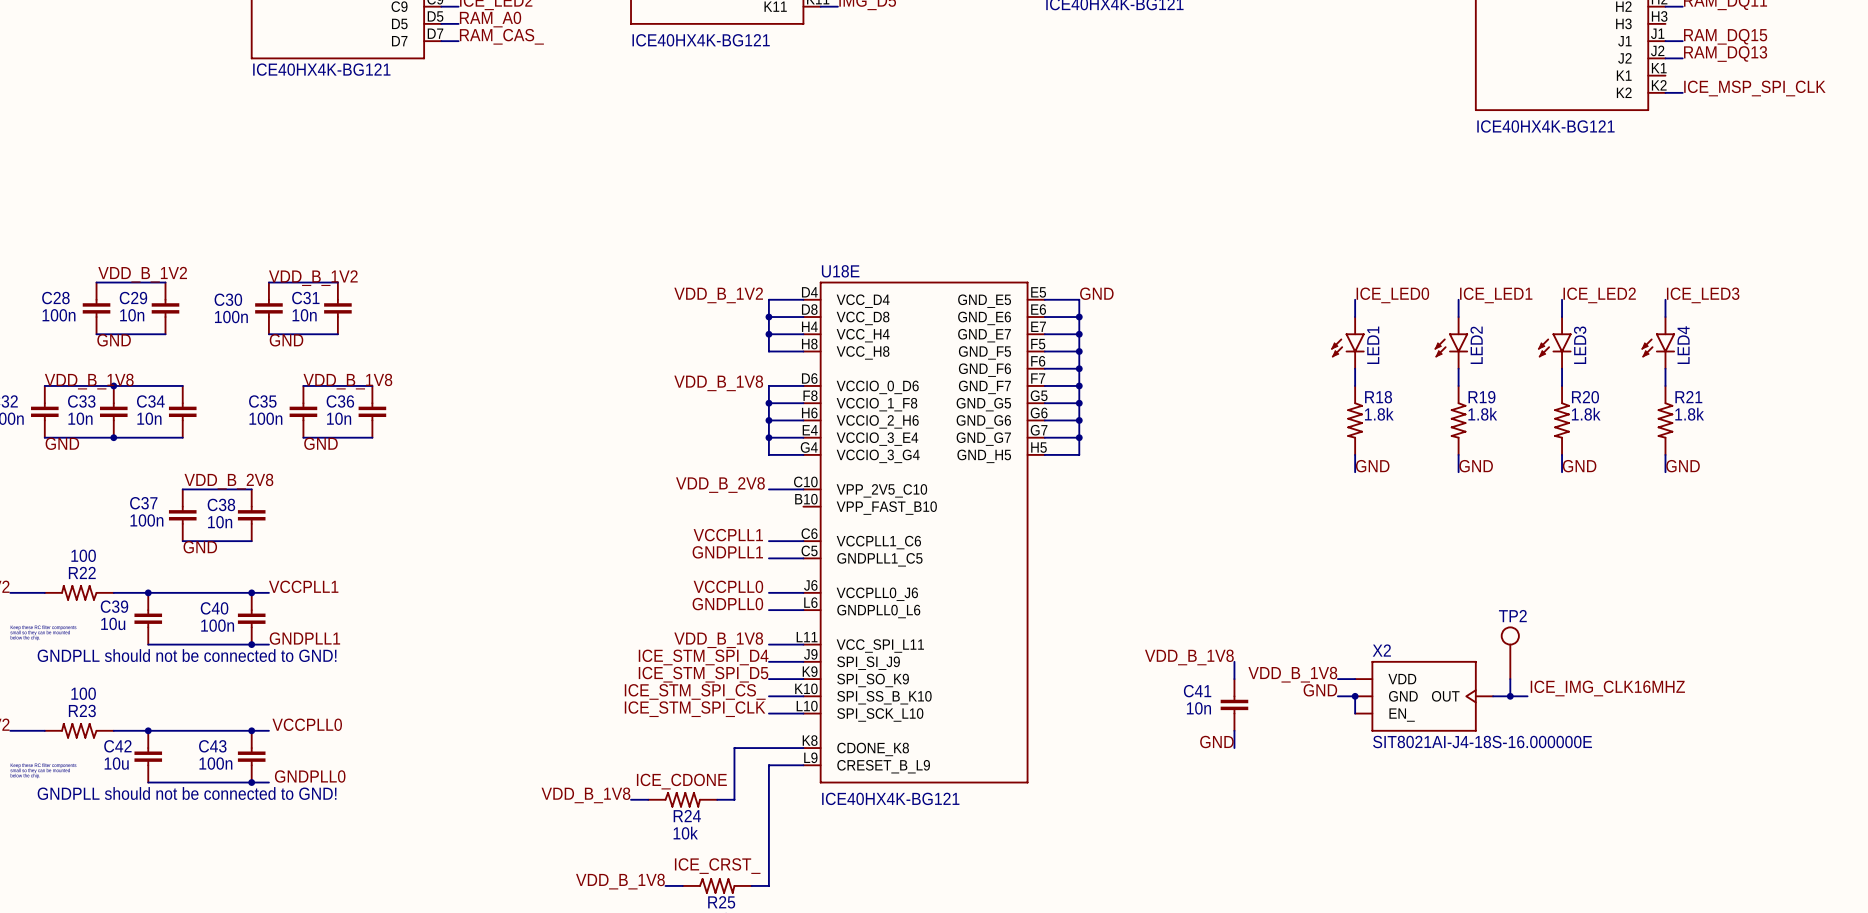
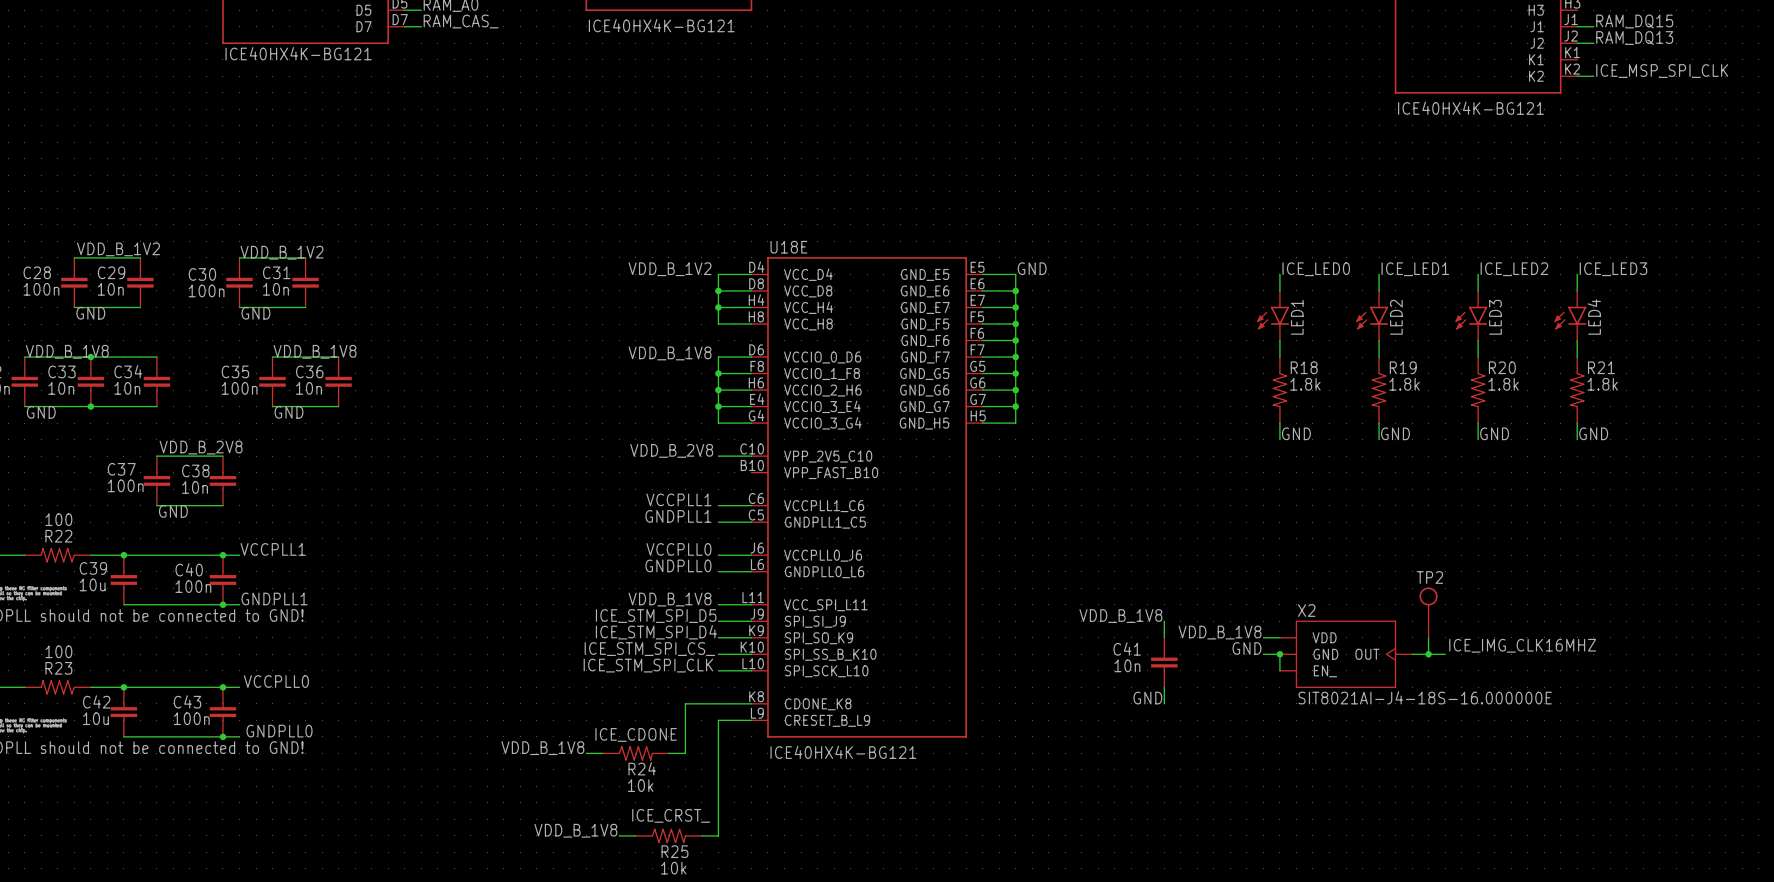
label: ICE_STM_SPI_D4 (703, 657) -> ICE_STM_SPI_D5 (656, 616)
label: ICE_STM_SPI_D5 (703, 674) -> ICE_STM_SPI_D4 (656, 632)

